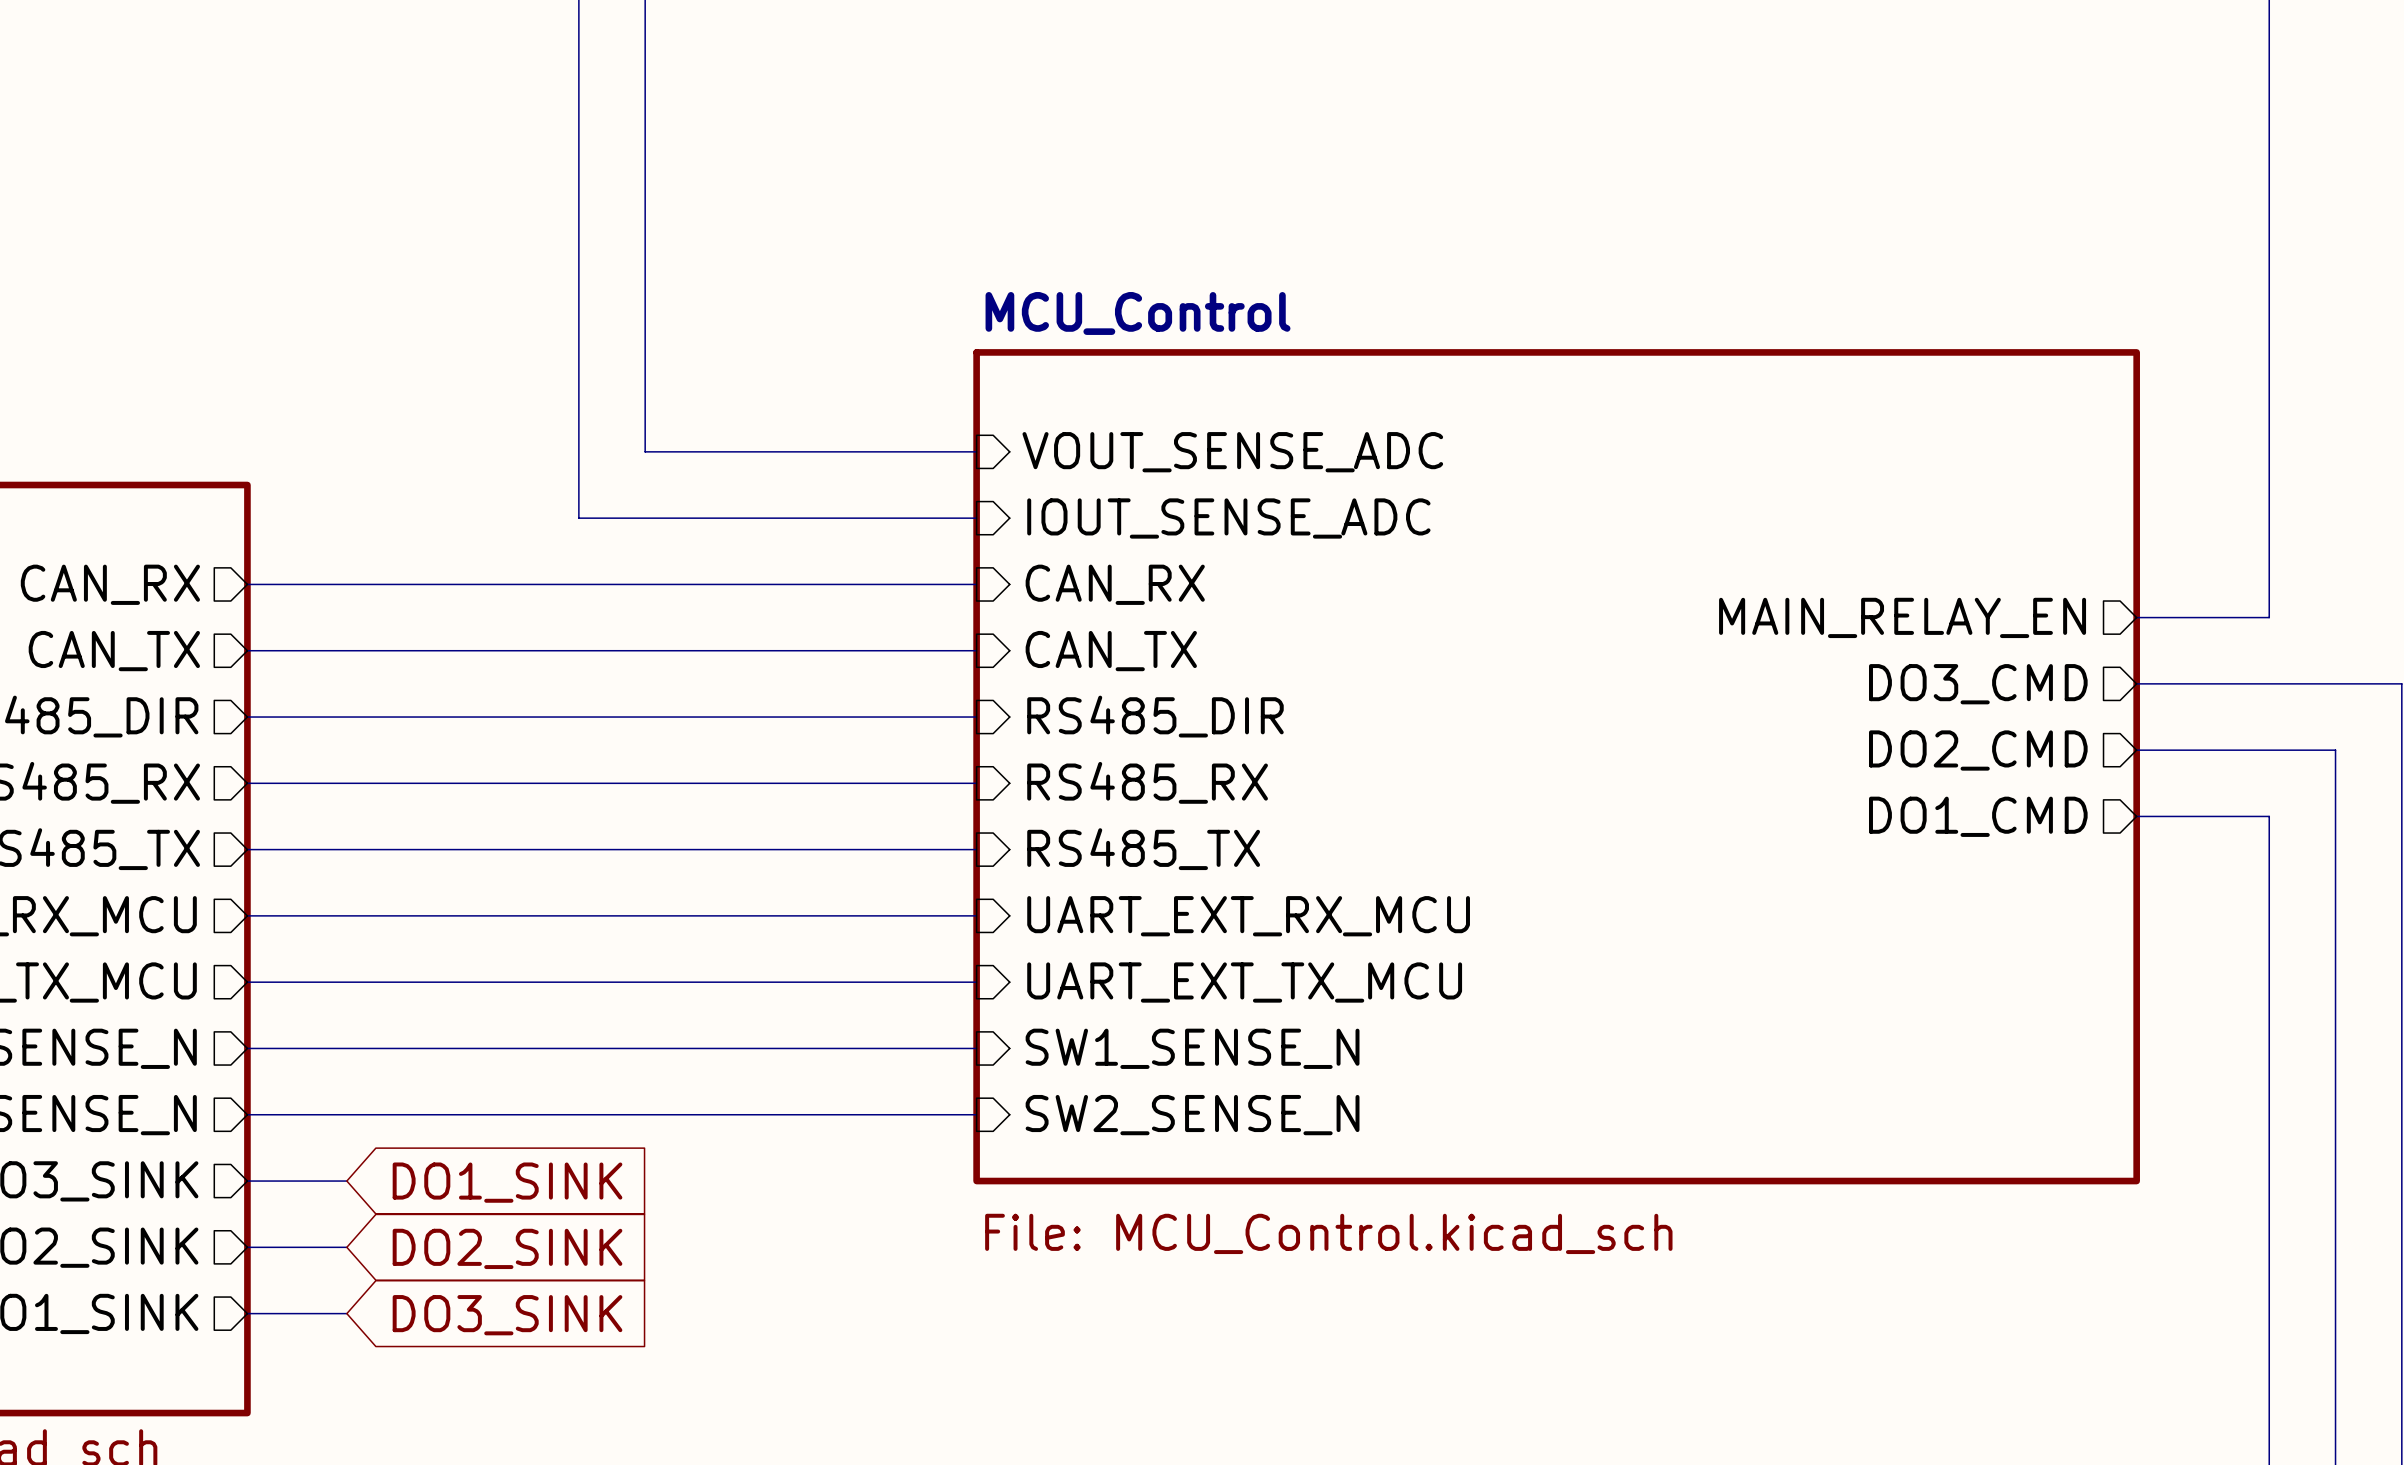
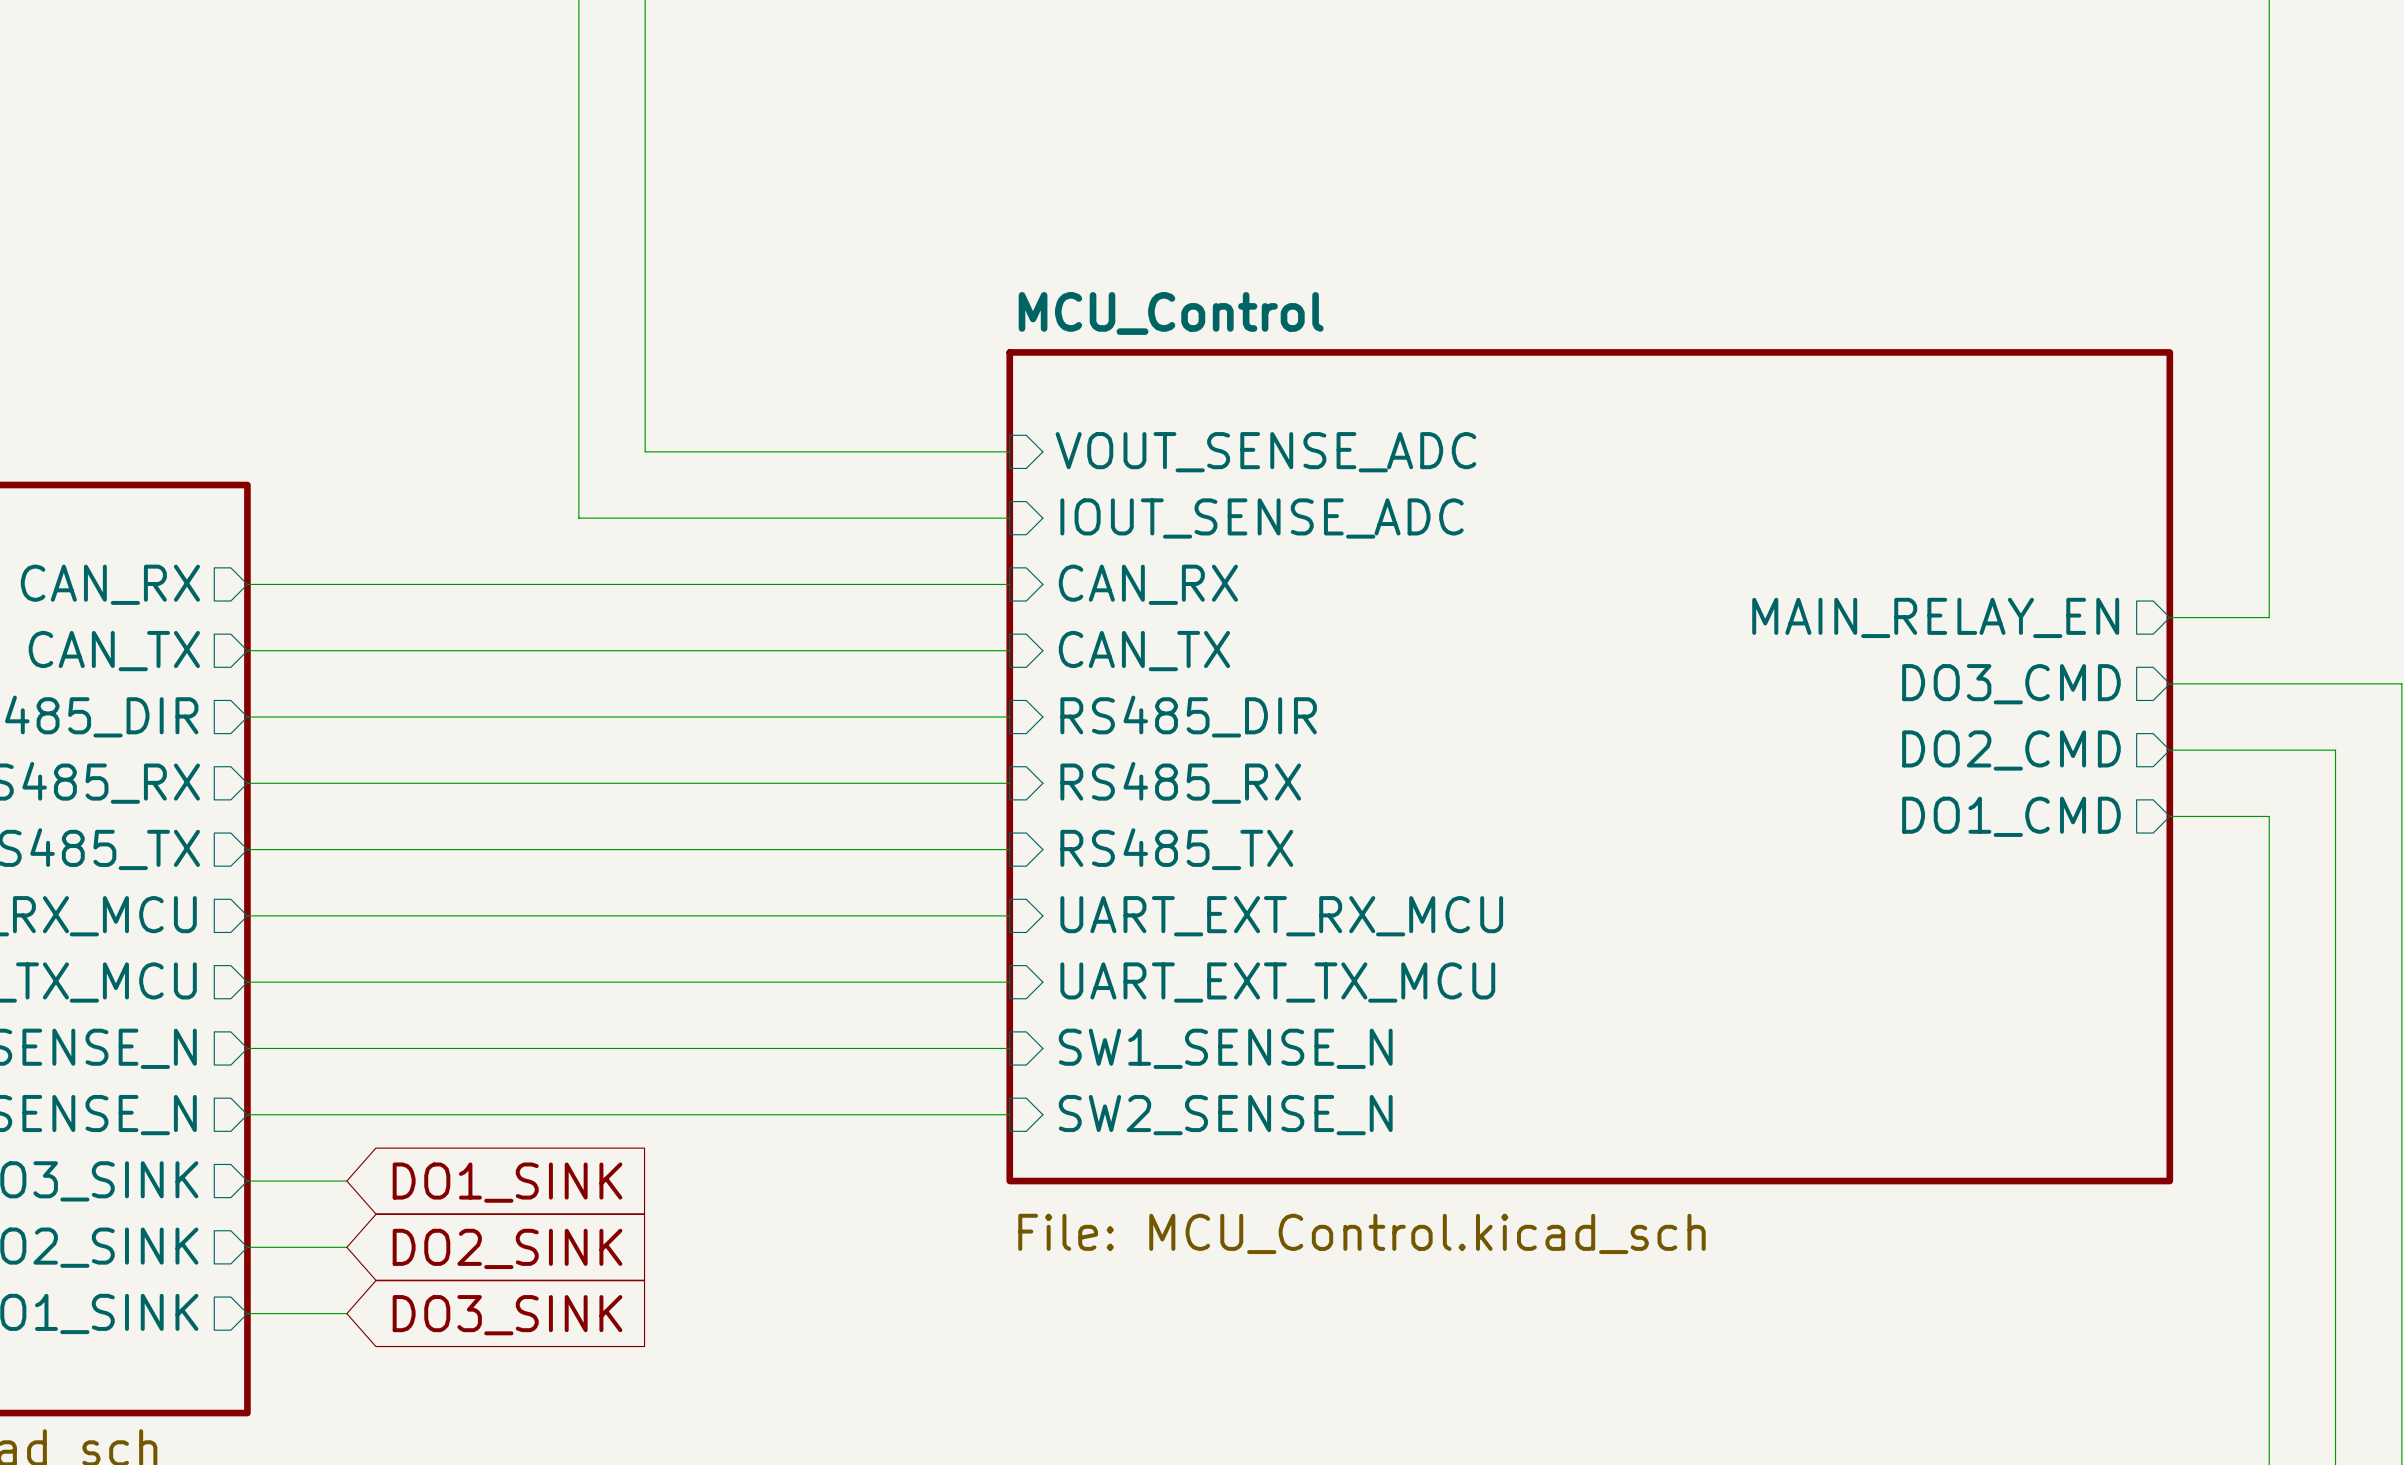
wire: none -> (976, 451) (1009, 451)
sheet pin position: VOUT_SENSE_ADC (1232, 452) -> VOUT_SENSE_ADC (1265, 452)
wire: none -> (976, 518) (1009, 518)
sheet pin position: IOUT_SENSE_ADC (1228, 518) -> IOUT_SENSE_ADC (1262, 518)
wire: none -> (976, 584) (1009, 584)
sheet pin position: CAN_RX (1115, 584) -> CAN_RX (1148, 584)
sheet pin position: MAIN_RELAY_EN (1902, 617) -> MAIN_RELAY_EN (1935, 617)
wire: (2136, 617) (2169, 617) -> none
wire: none -> (976, 650) (1009, 650)
sheet pin position: CAN_TX (1111, 651) -> CAN_TX (1144, 651)
wire: (2136, 683) (2169, 683) -> none
sheet pin position: DO3_CMD (1978, 684) -> DO3_CMD (2011, 684)
sheet pin position: RS485_DIR (1155, 716) -> RS485_DIR (1188, 716)
wire: none -> (976, 717) (1009, 717)
sheet pin position: DO2_CMD (1978, 750) -> DO2_CMD (2011, 750)
wire: (2136, 750) (2169, 750) -> none
sheet MCU_Control position: (1556, 766) -> (1589, 766)
sheet pin position: RS485_RX (1147, 782) -> RS485_RX (1180, 782)
wire: none -> (976, 783) (1009, 783)
sheet pin position: DO1_CMD (1978, 816) -> DO1_CMD (2011, 816)
wire: (2136, 816) (2169, 816) -> none
wire: none -> (976, 849) (1009, 849)
sheet pin position: RS485_TX (1143, 849) -> RS485_TX (1176, 849)
wire: none -> (976, 915) (1009, 915)
sheet pin position: UART_EXT_RX_MCU (1248, 916) -> UART_EXT_RX_MCU (1281, 916)
wire: none -> (976, 982) (1009, 982)
sheet pin position: UART_EXT_TX_MCU (1244, 982) -> UART_EXT_TX_MCU (1277, 982)
wire: none -> (976, 1048) (1009, 1048)
sheet pin position: SW1_SENSE_N (1192, 1048) -> SW1_SENSE_N (1225, 1048)
wire: none -> (976, 1114) (1009, 1114)
sheet pin position: SW2_SENSE_N (1192, 1115) -> SW2_SENSE_N (1225, 1115)

